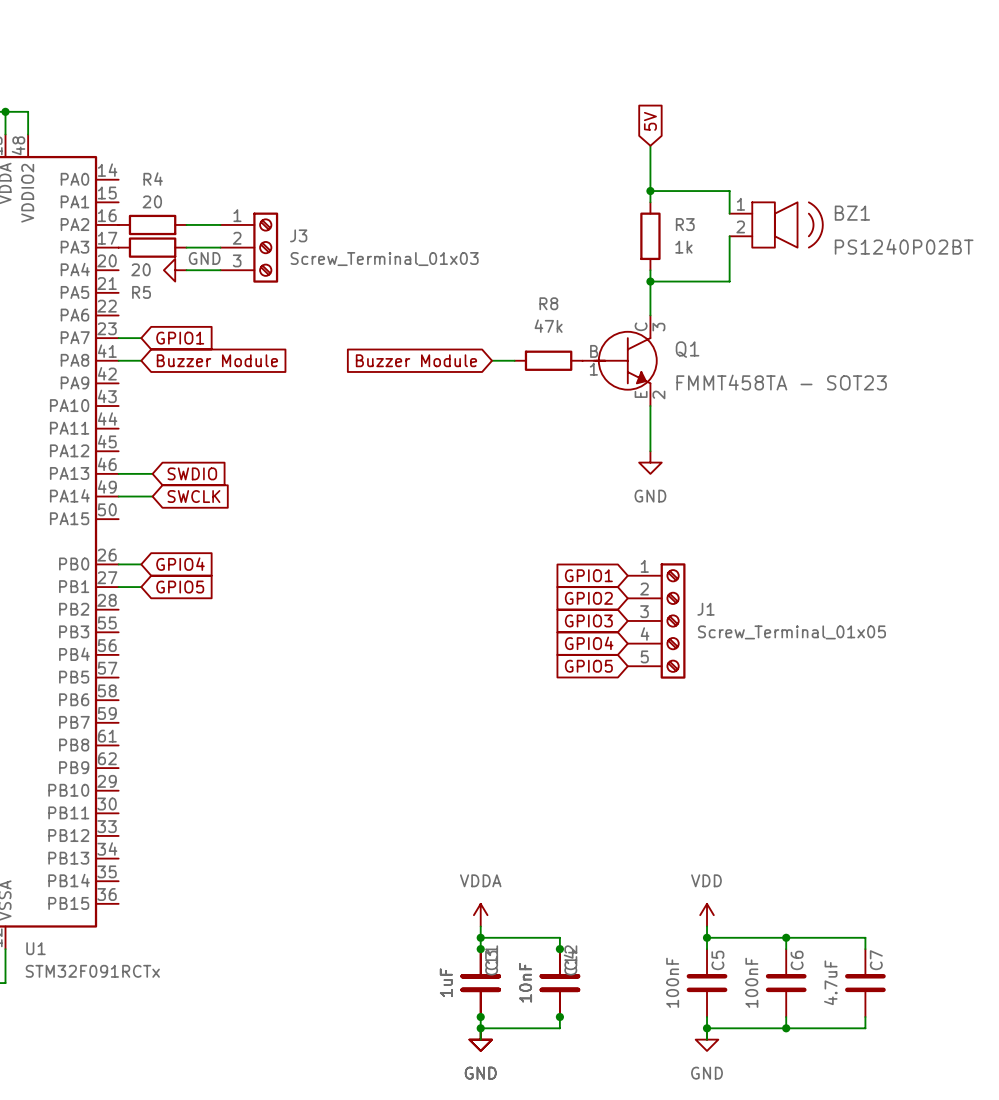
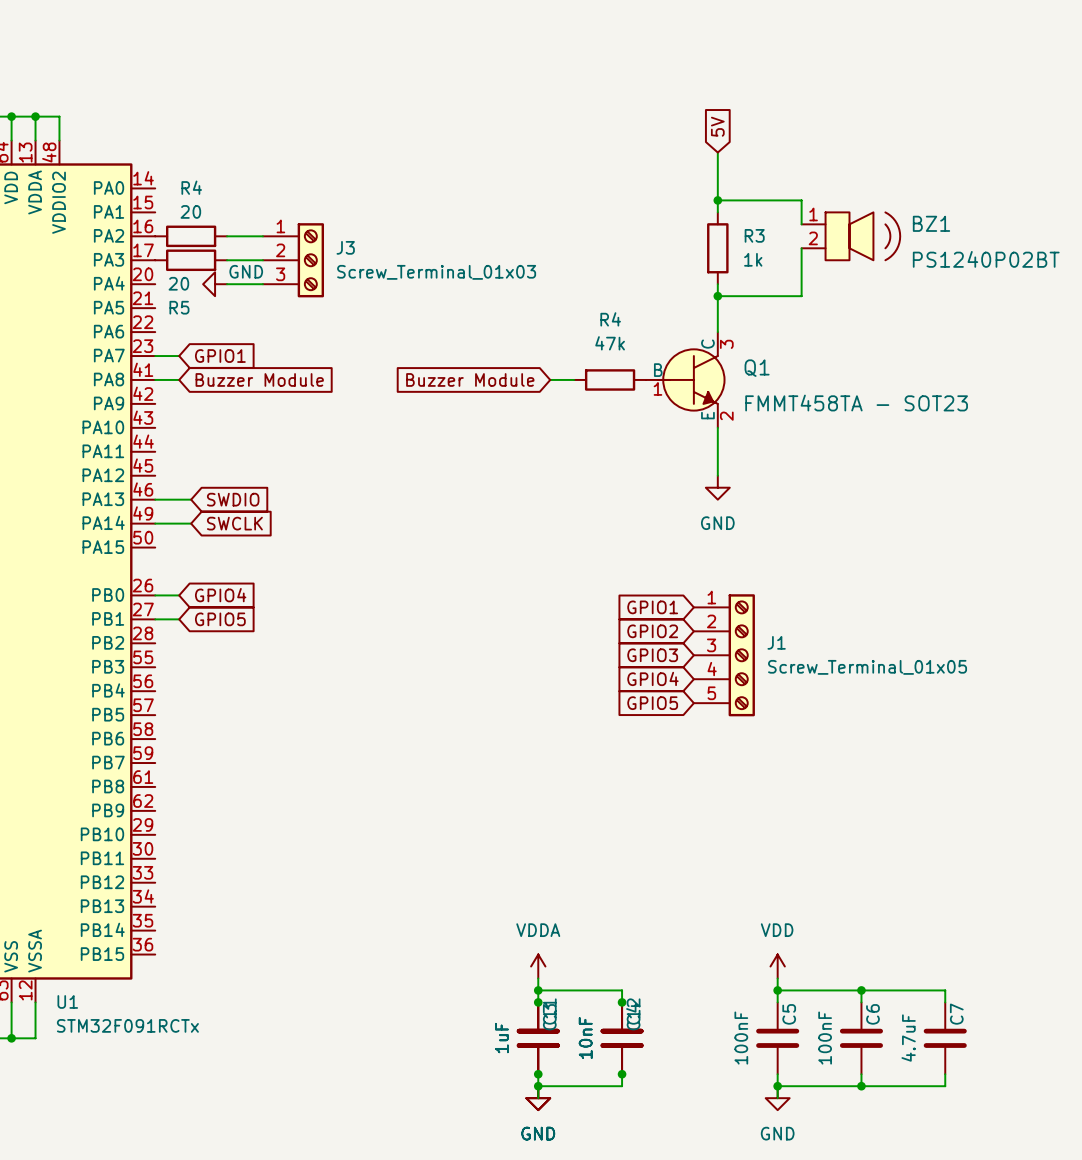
R8 name: R8 (548, 303) -> R4 (610, 319)

